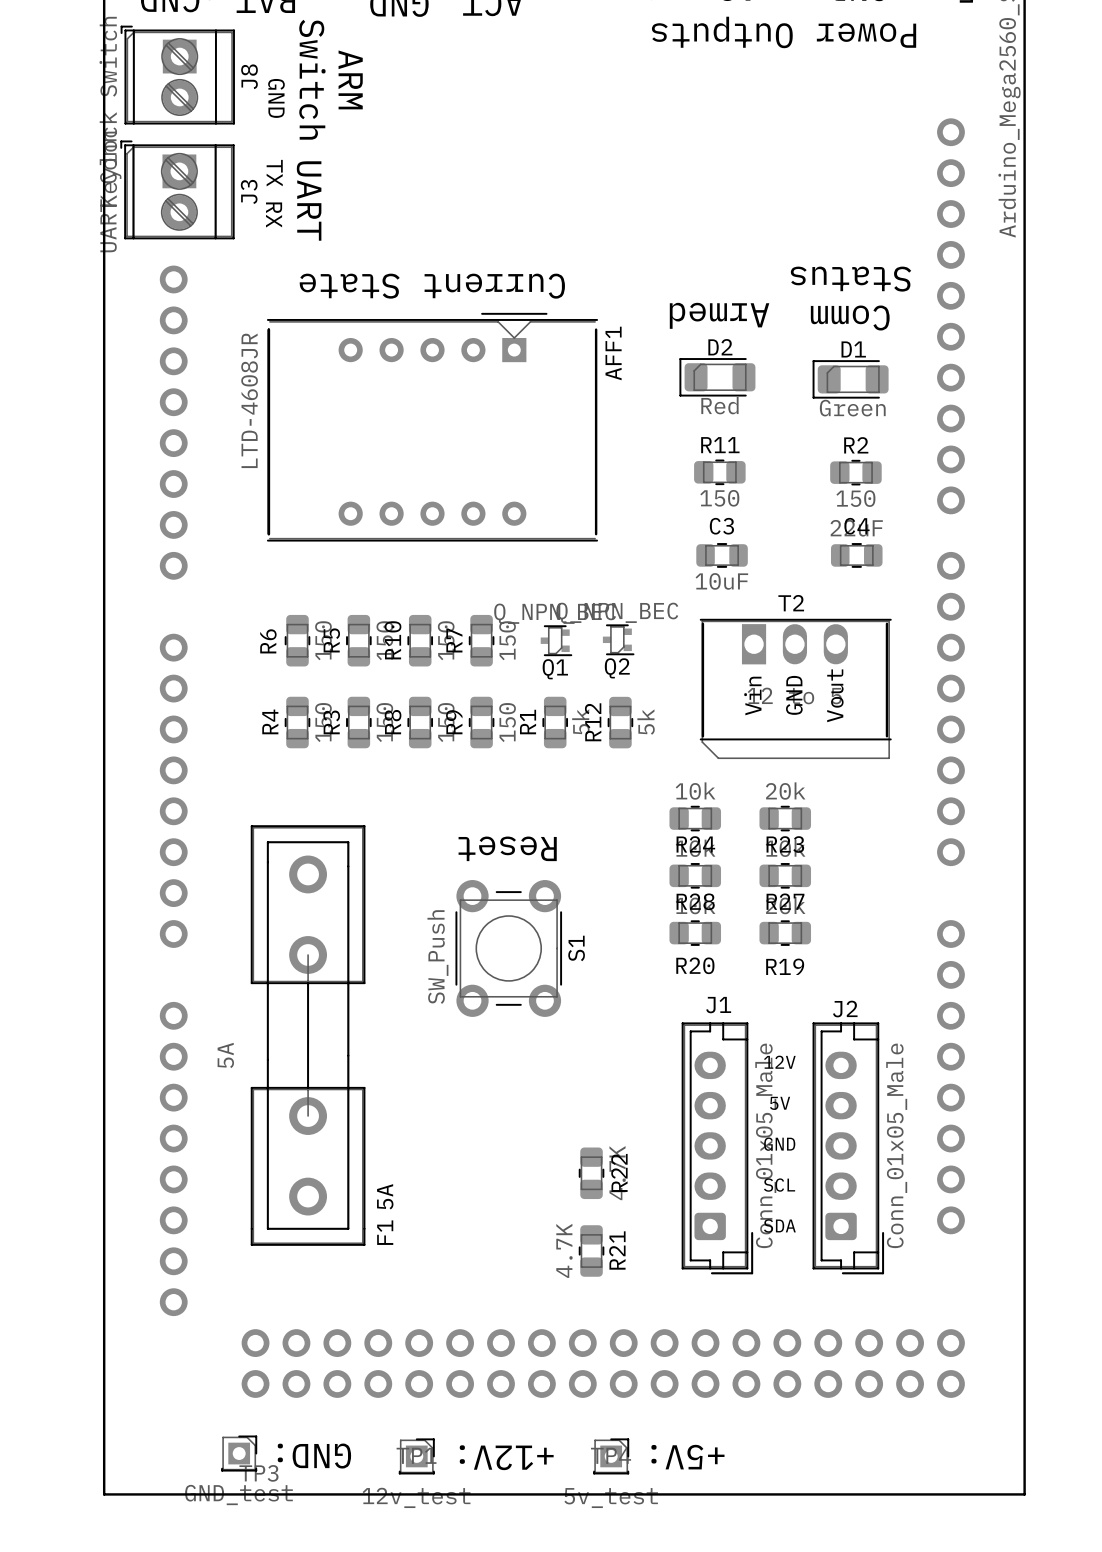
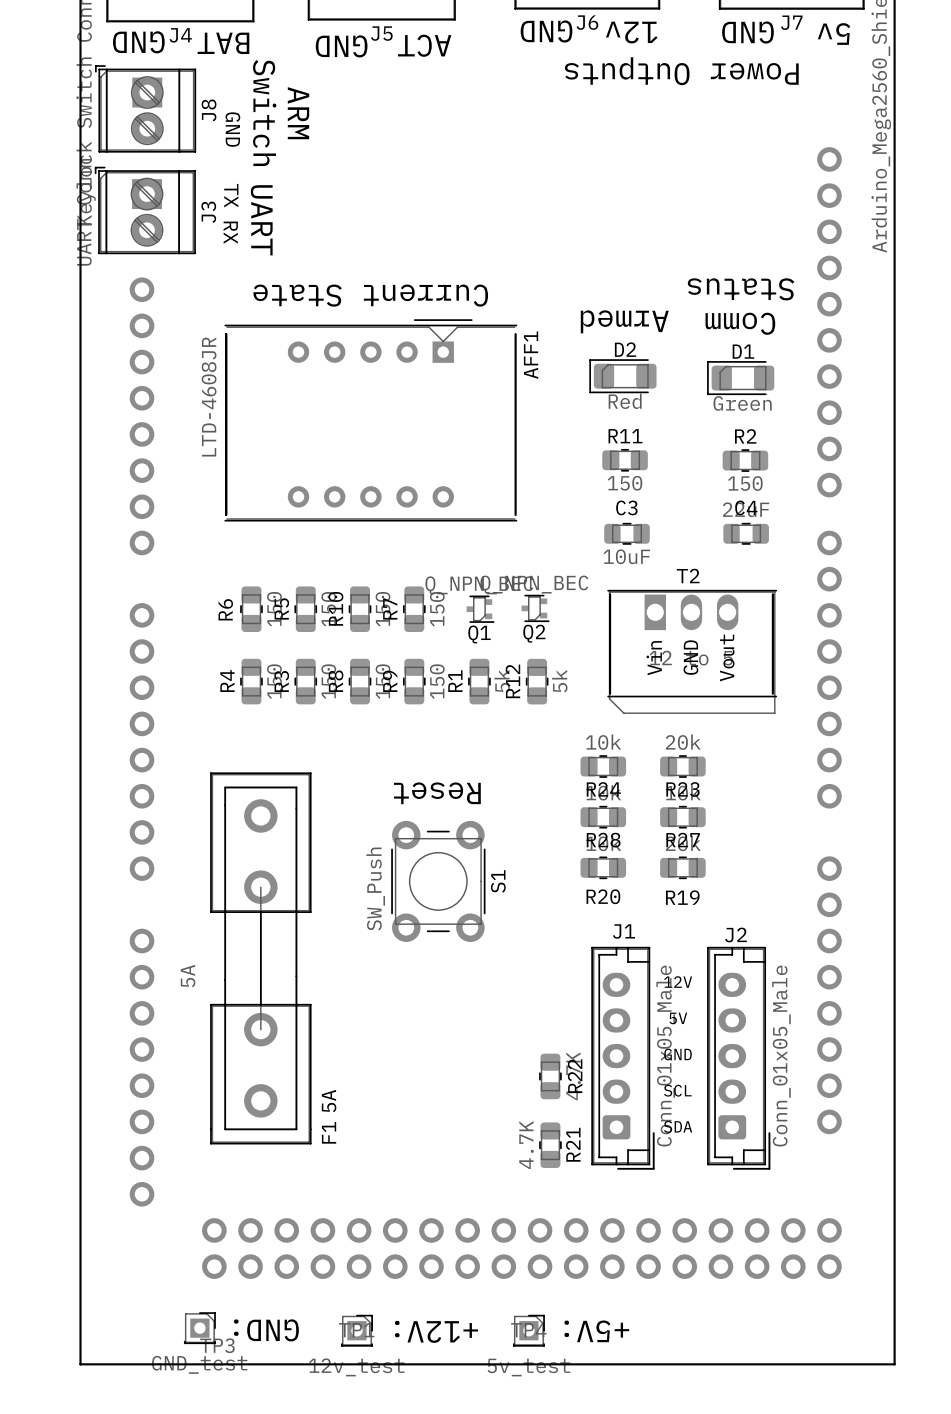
R22 position: (591, 1173) -> (550, 1076)
R21 position: (591, 1250) -> (550, 1145)

